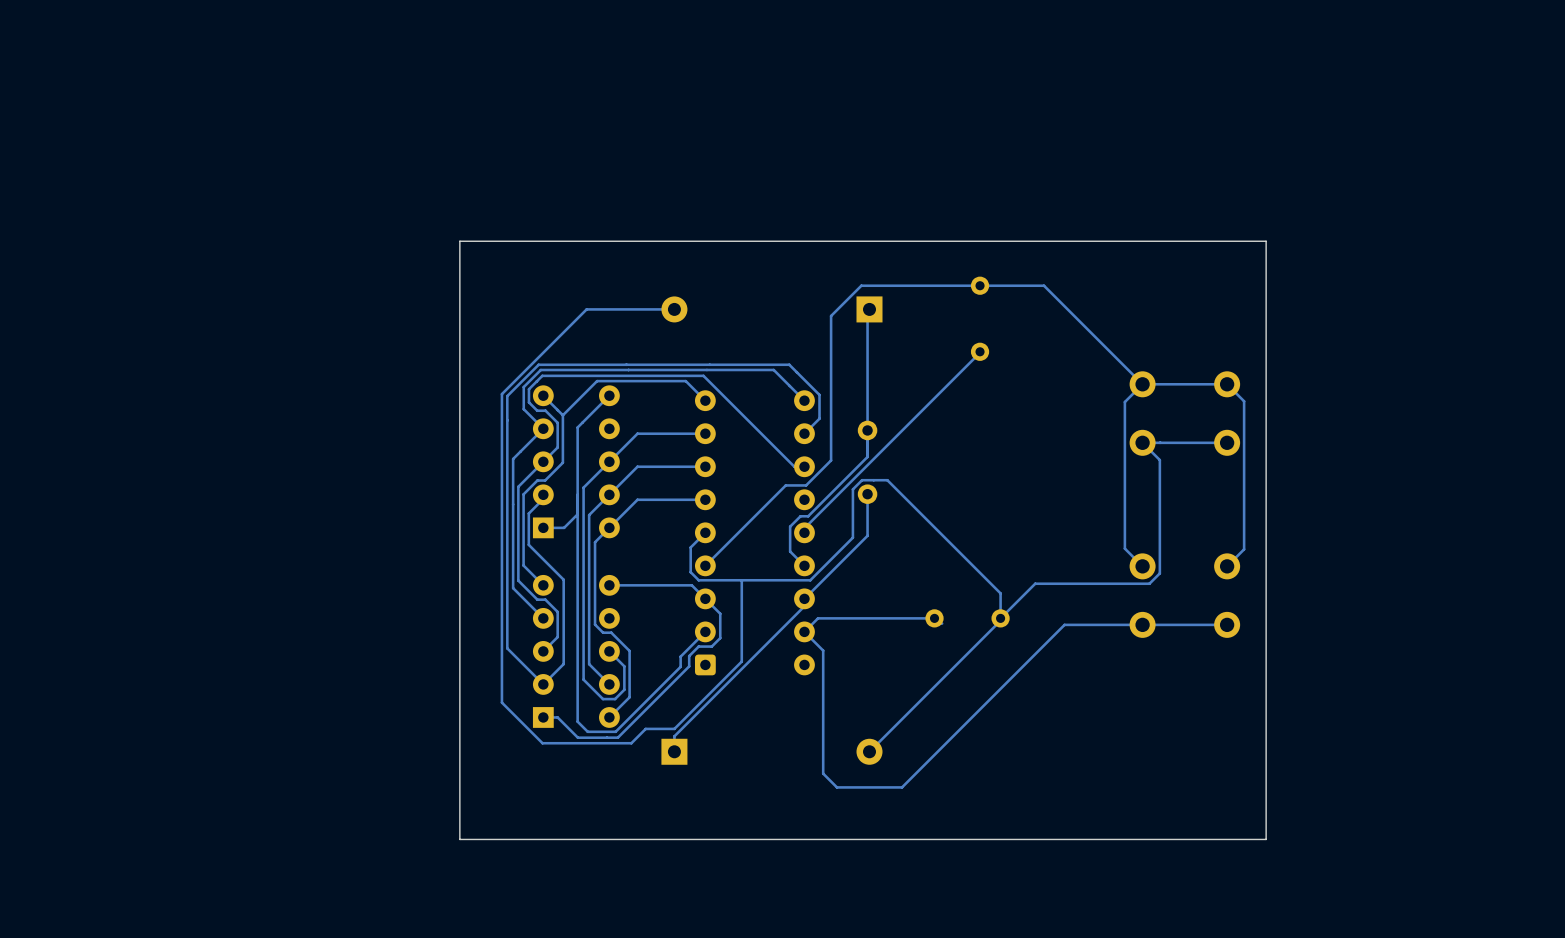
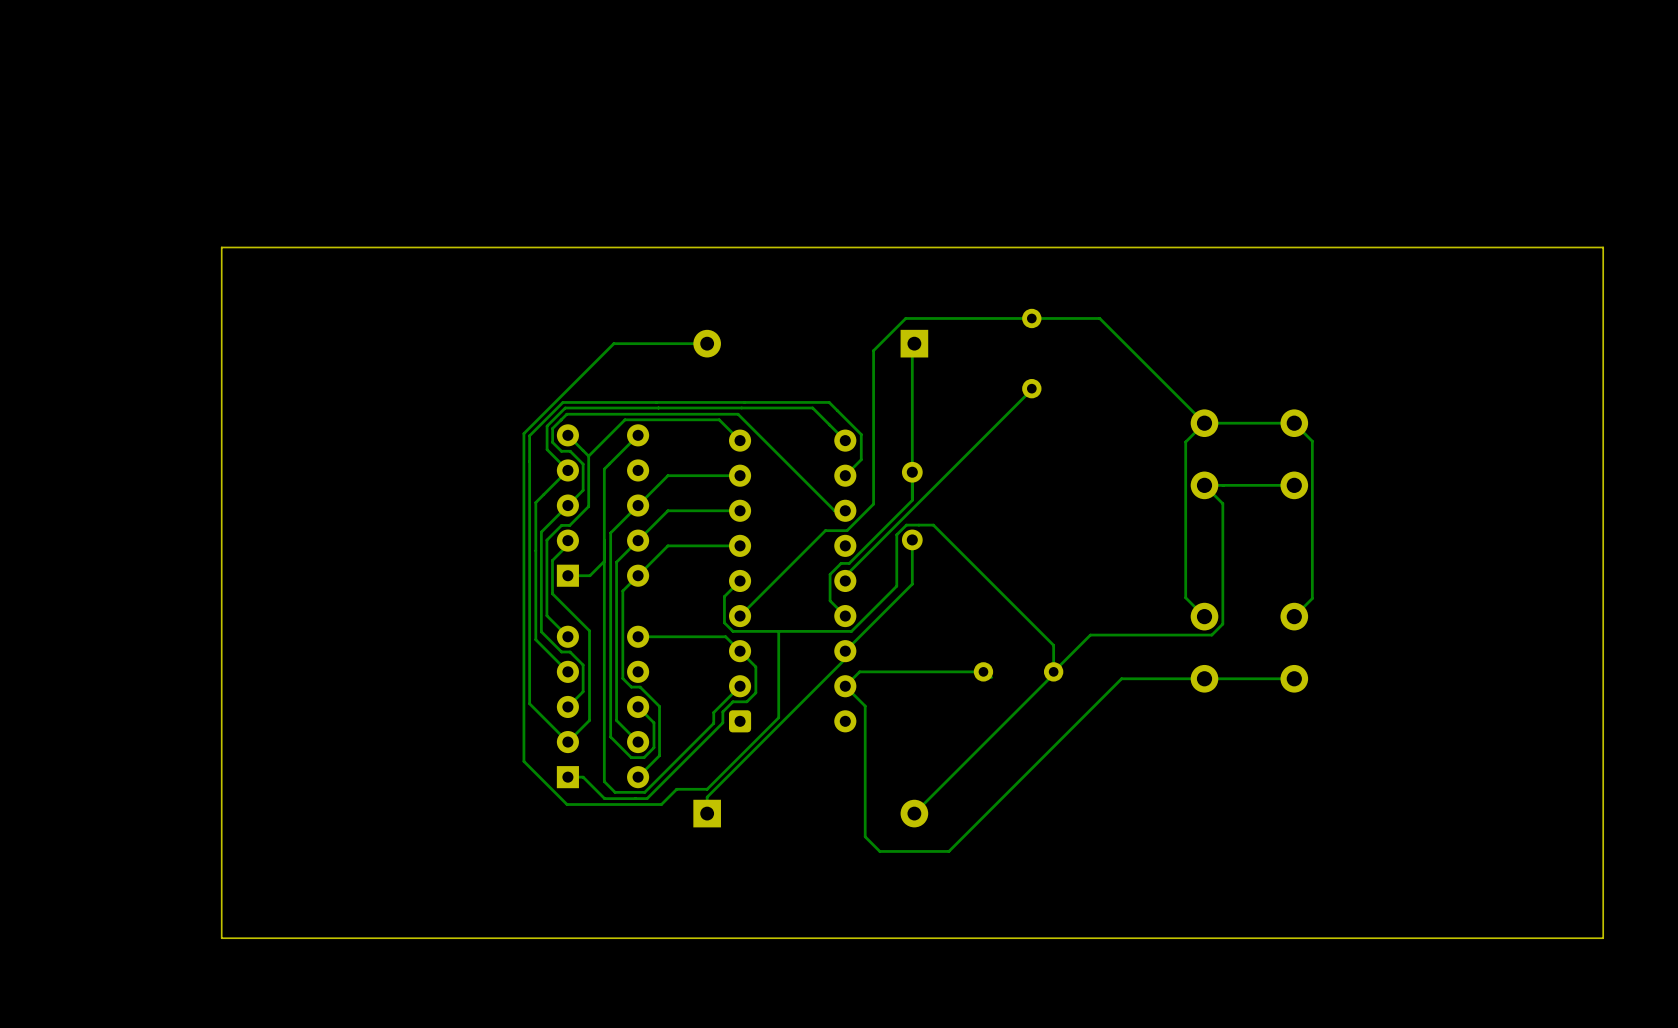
board edge: (1266, 241) (459, 241) (459, 839) (1266, 839) (1266, 241) -> (1603, 247) (1603, 938) (221, 938) (221, 247) (1603, 247)

